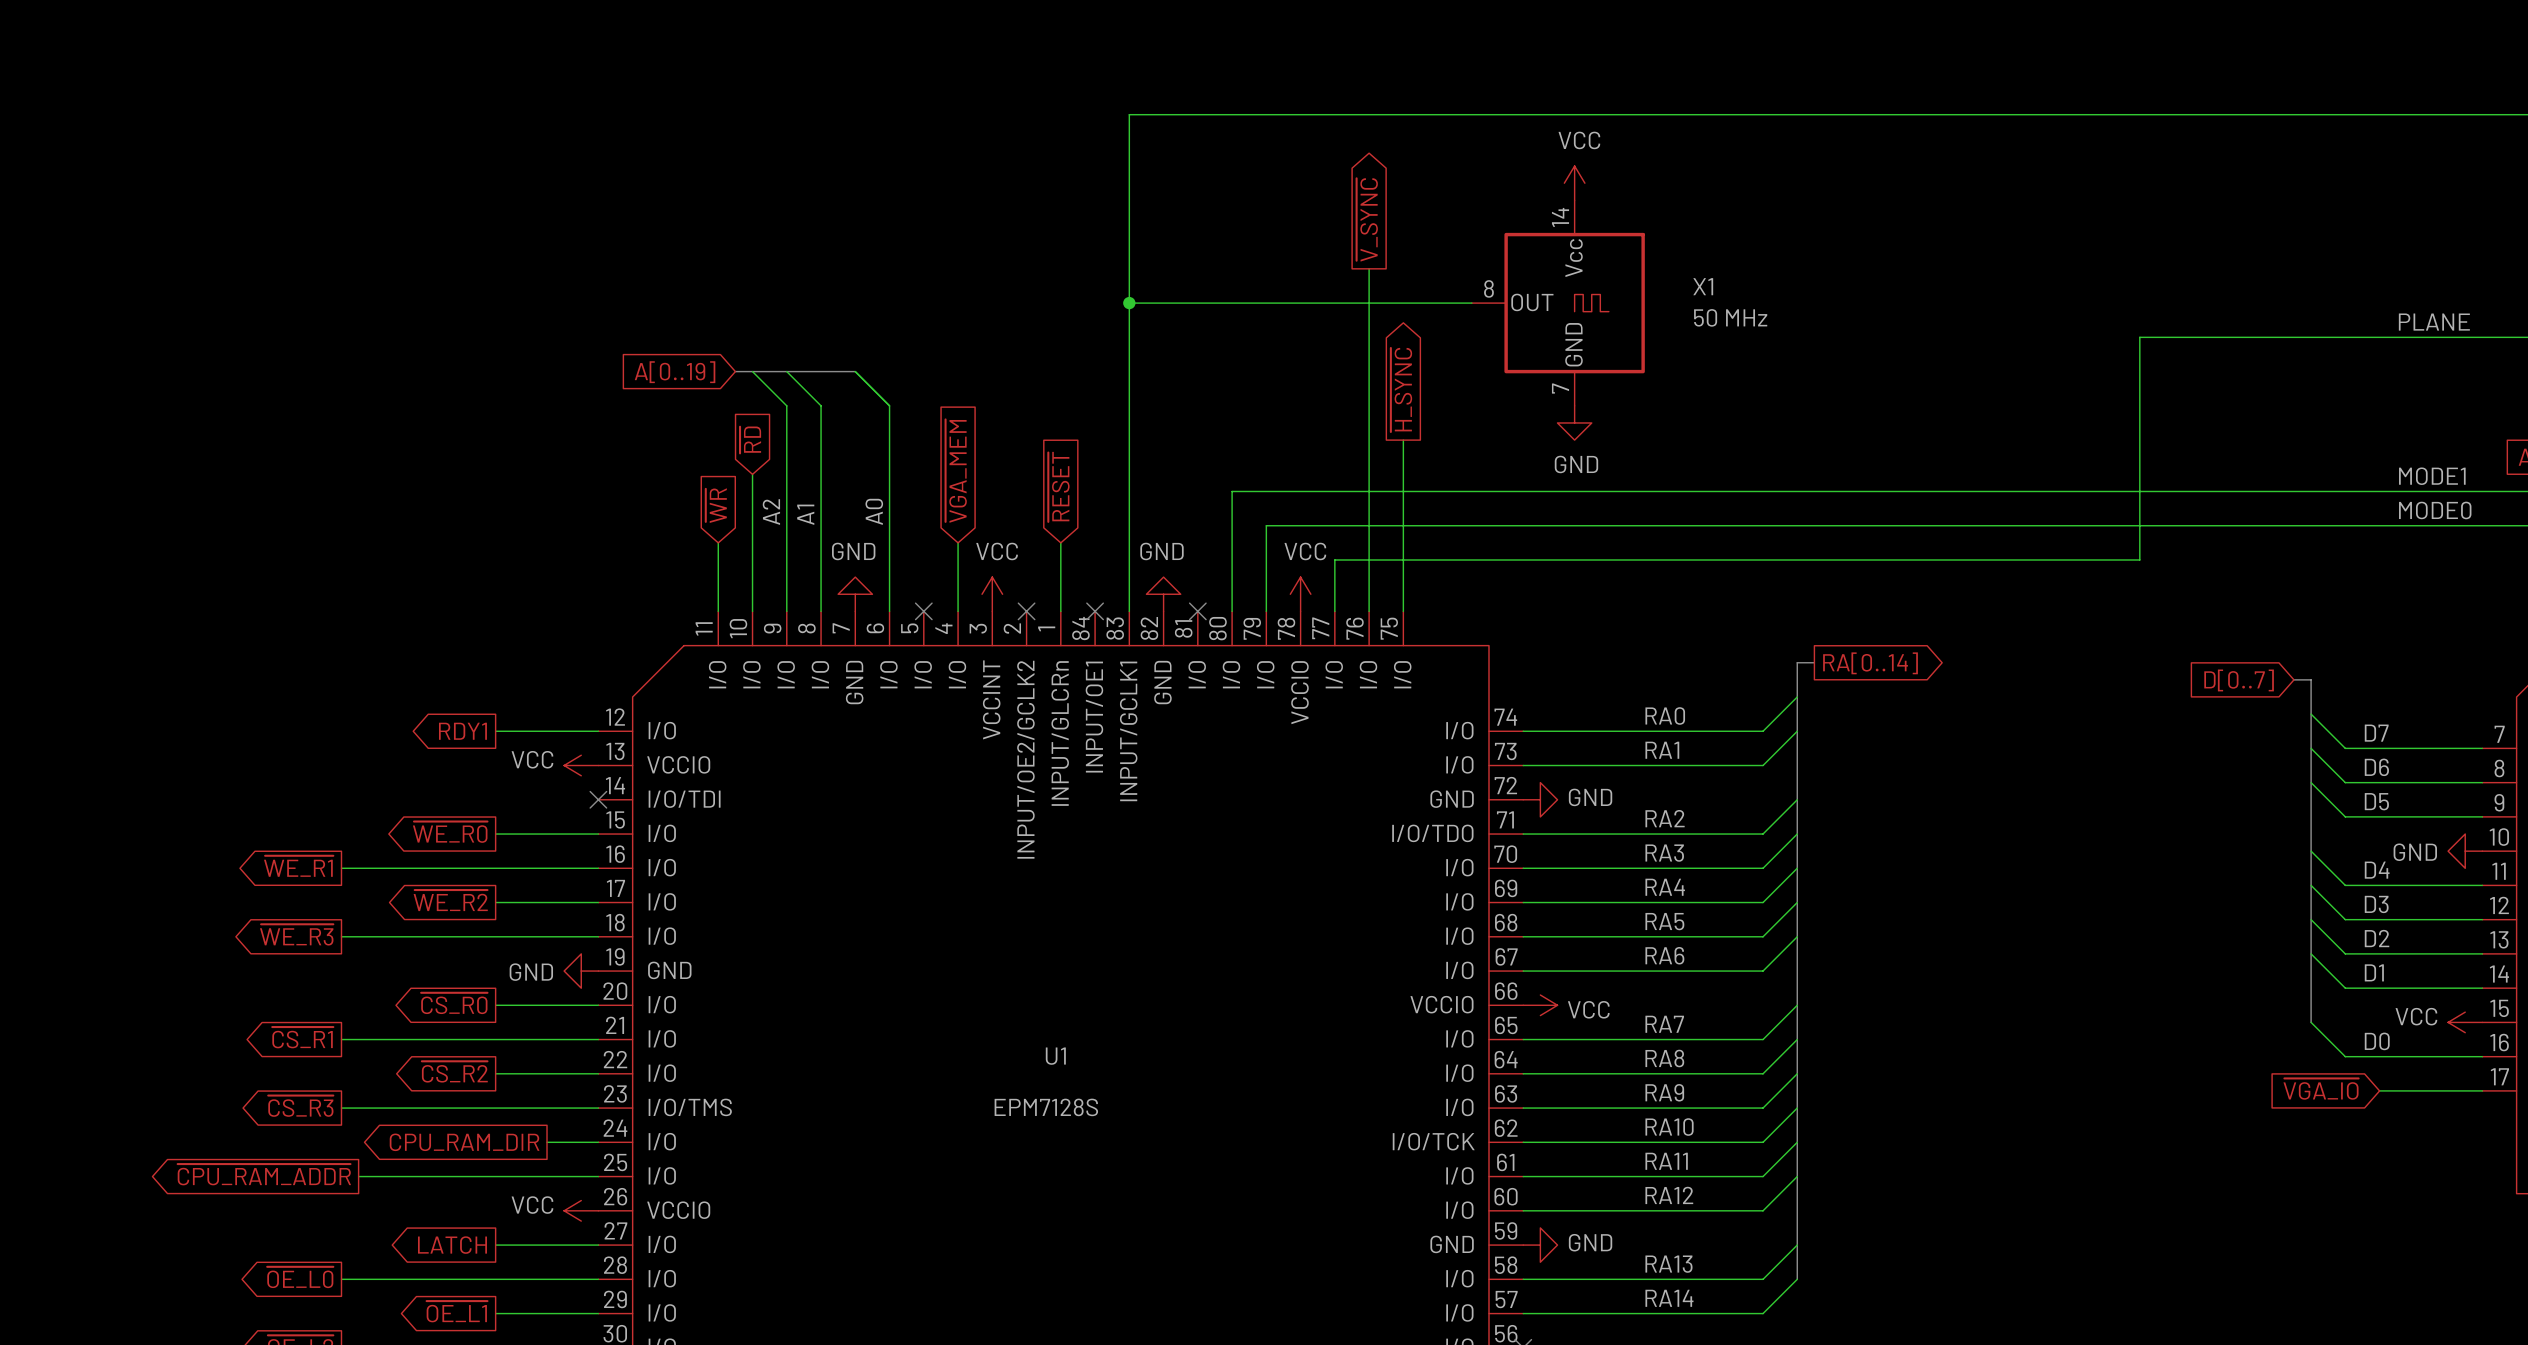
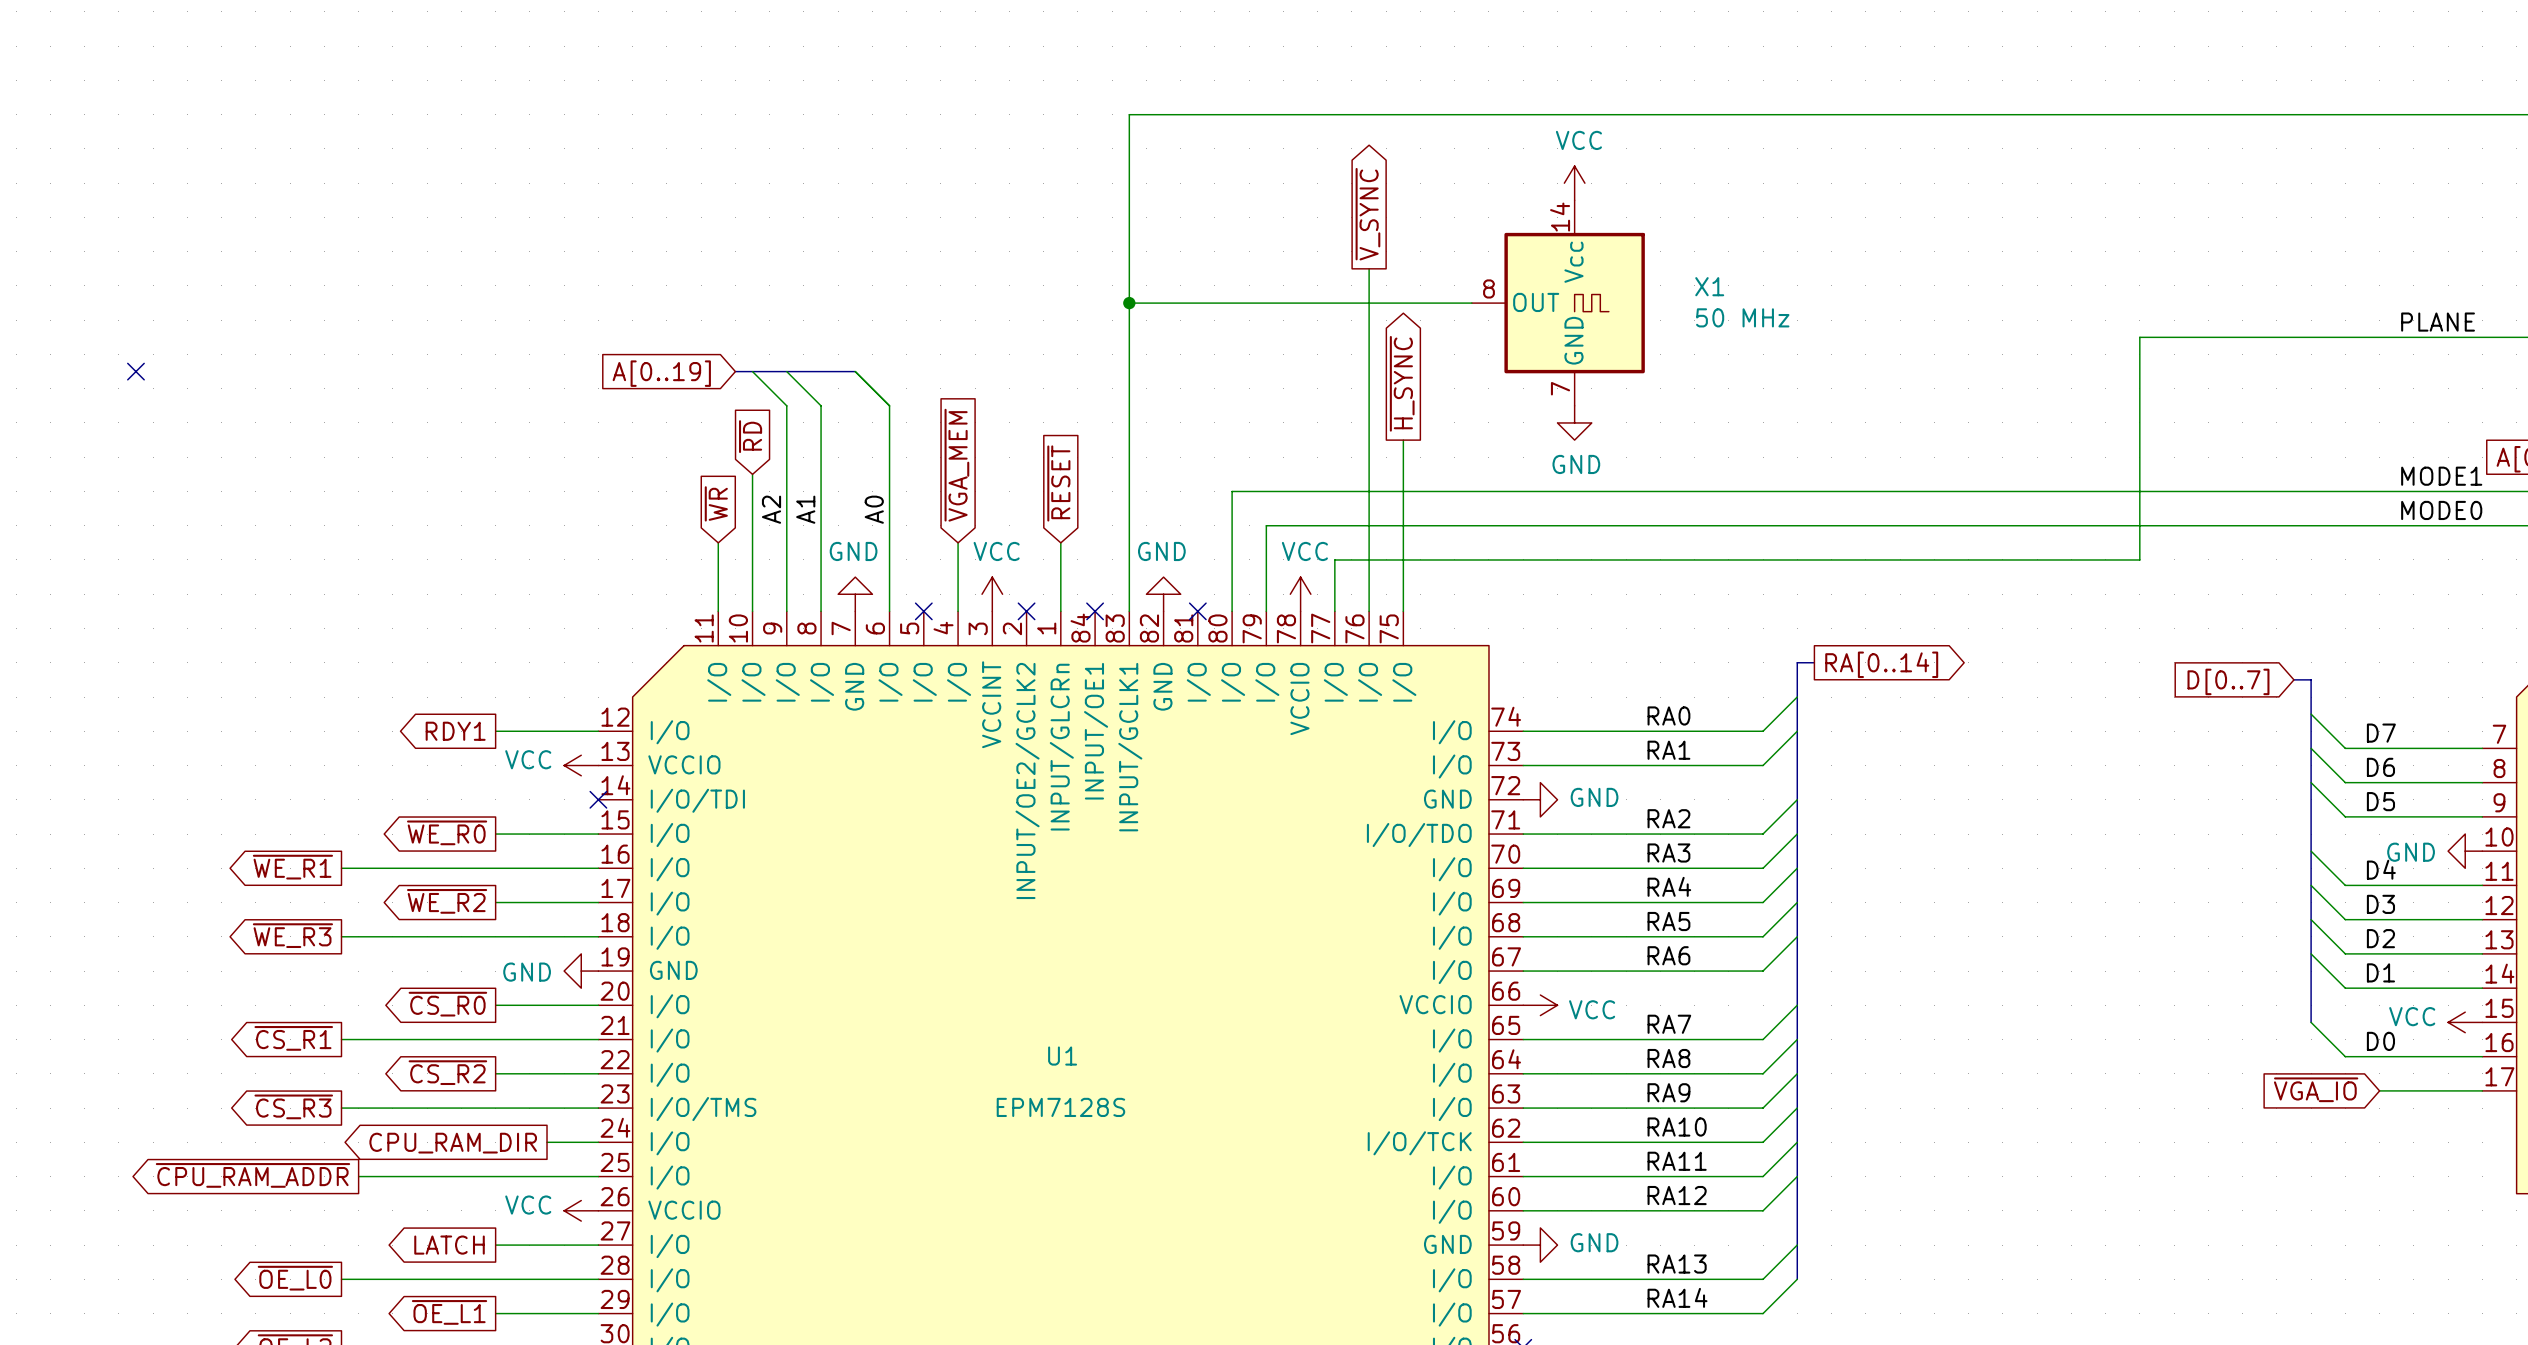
no-connect mark: none -> (135, 371)

